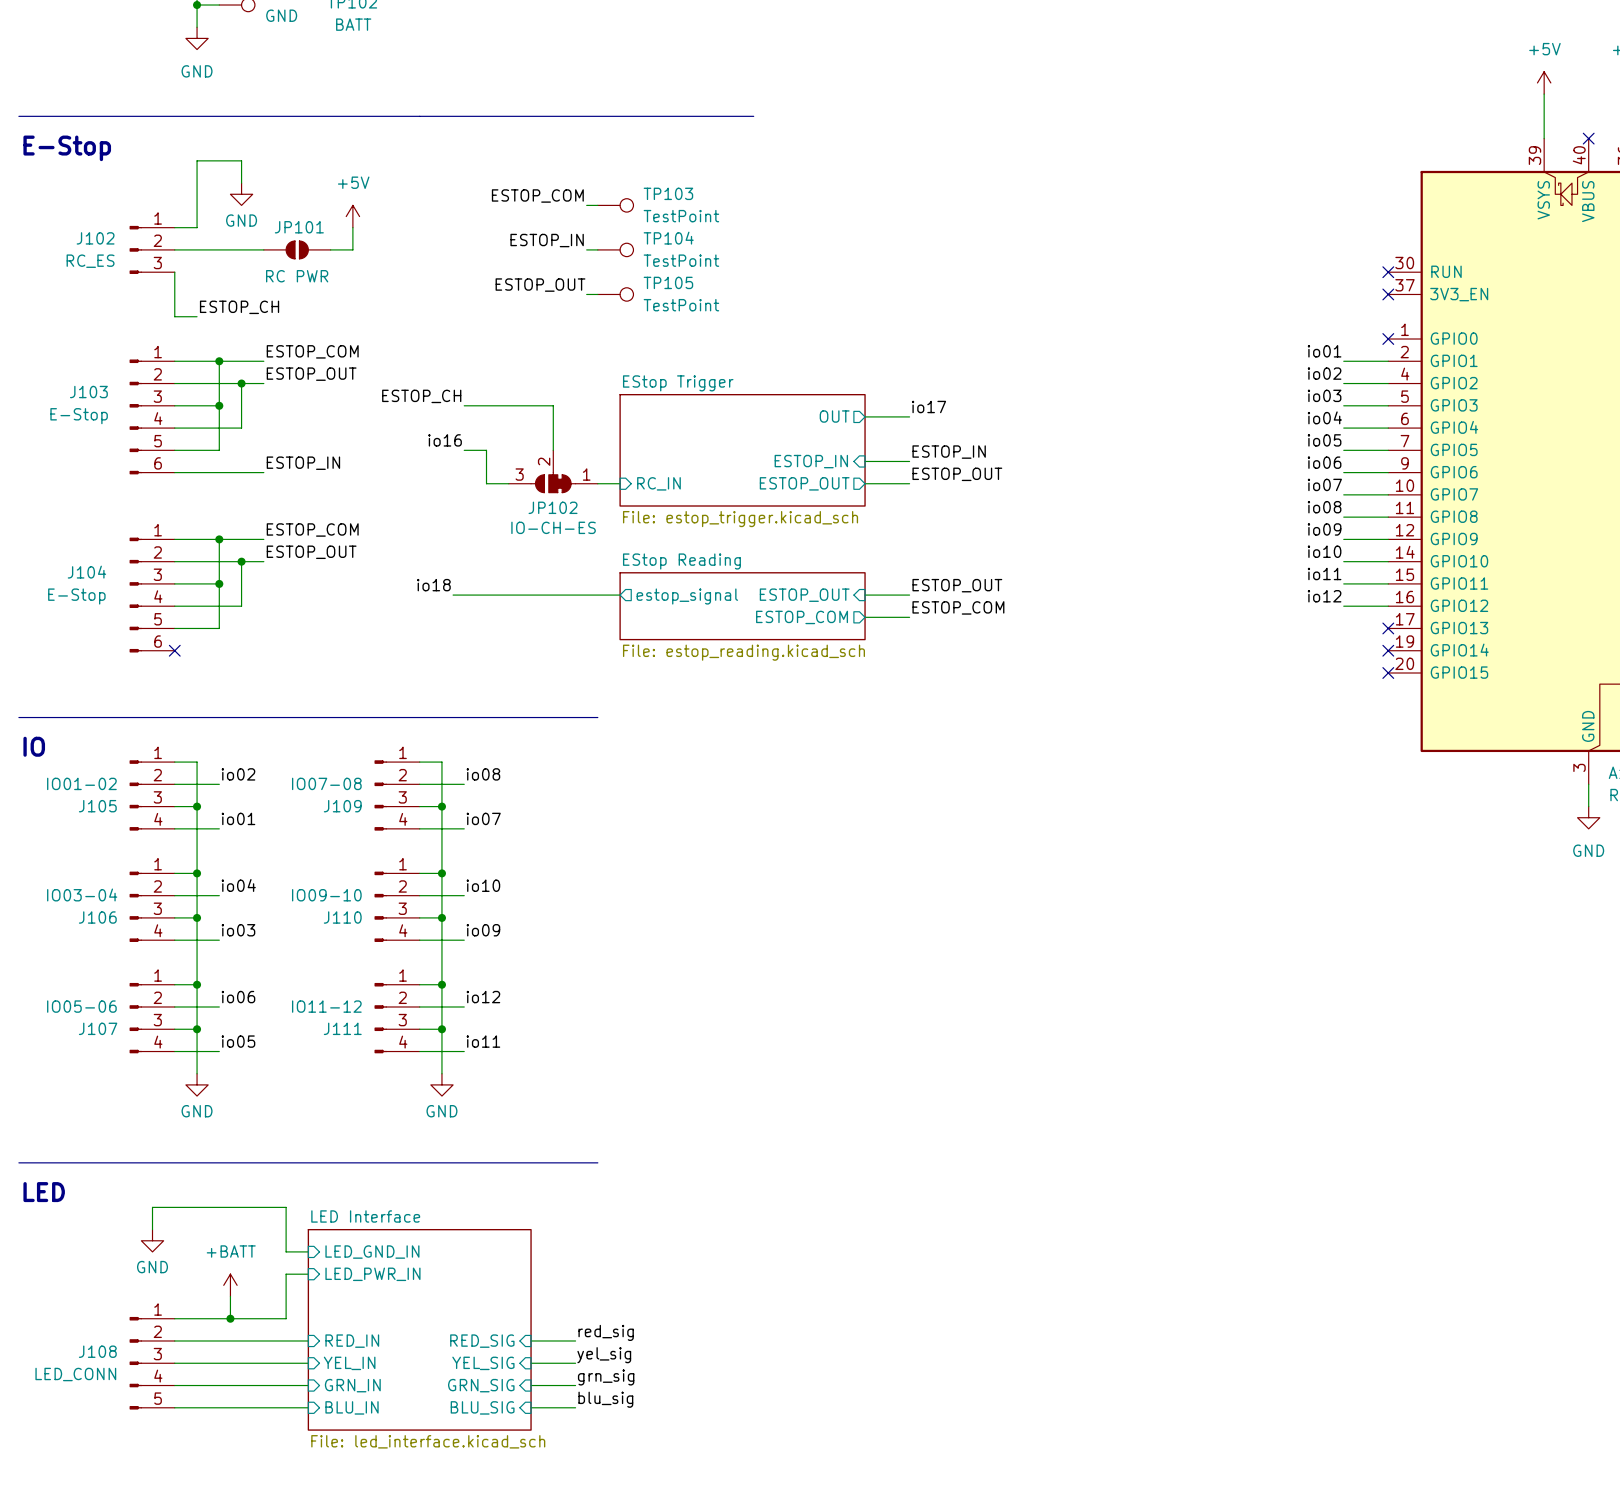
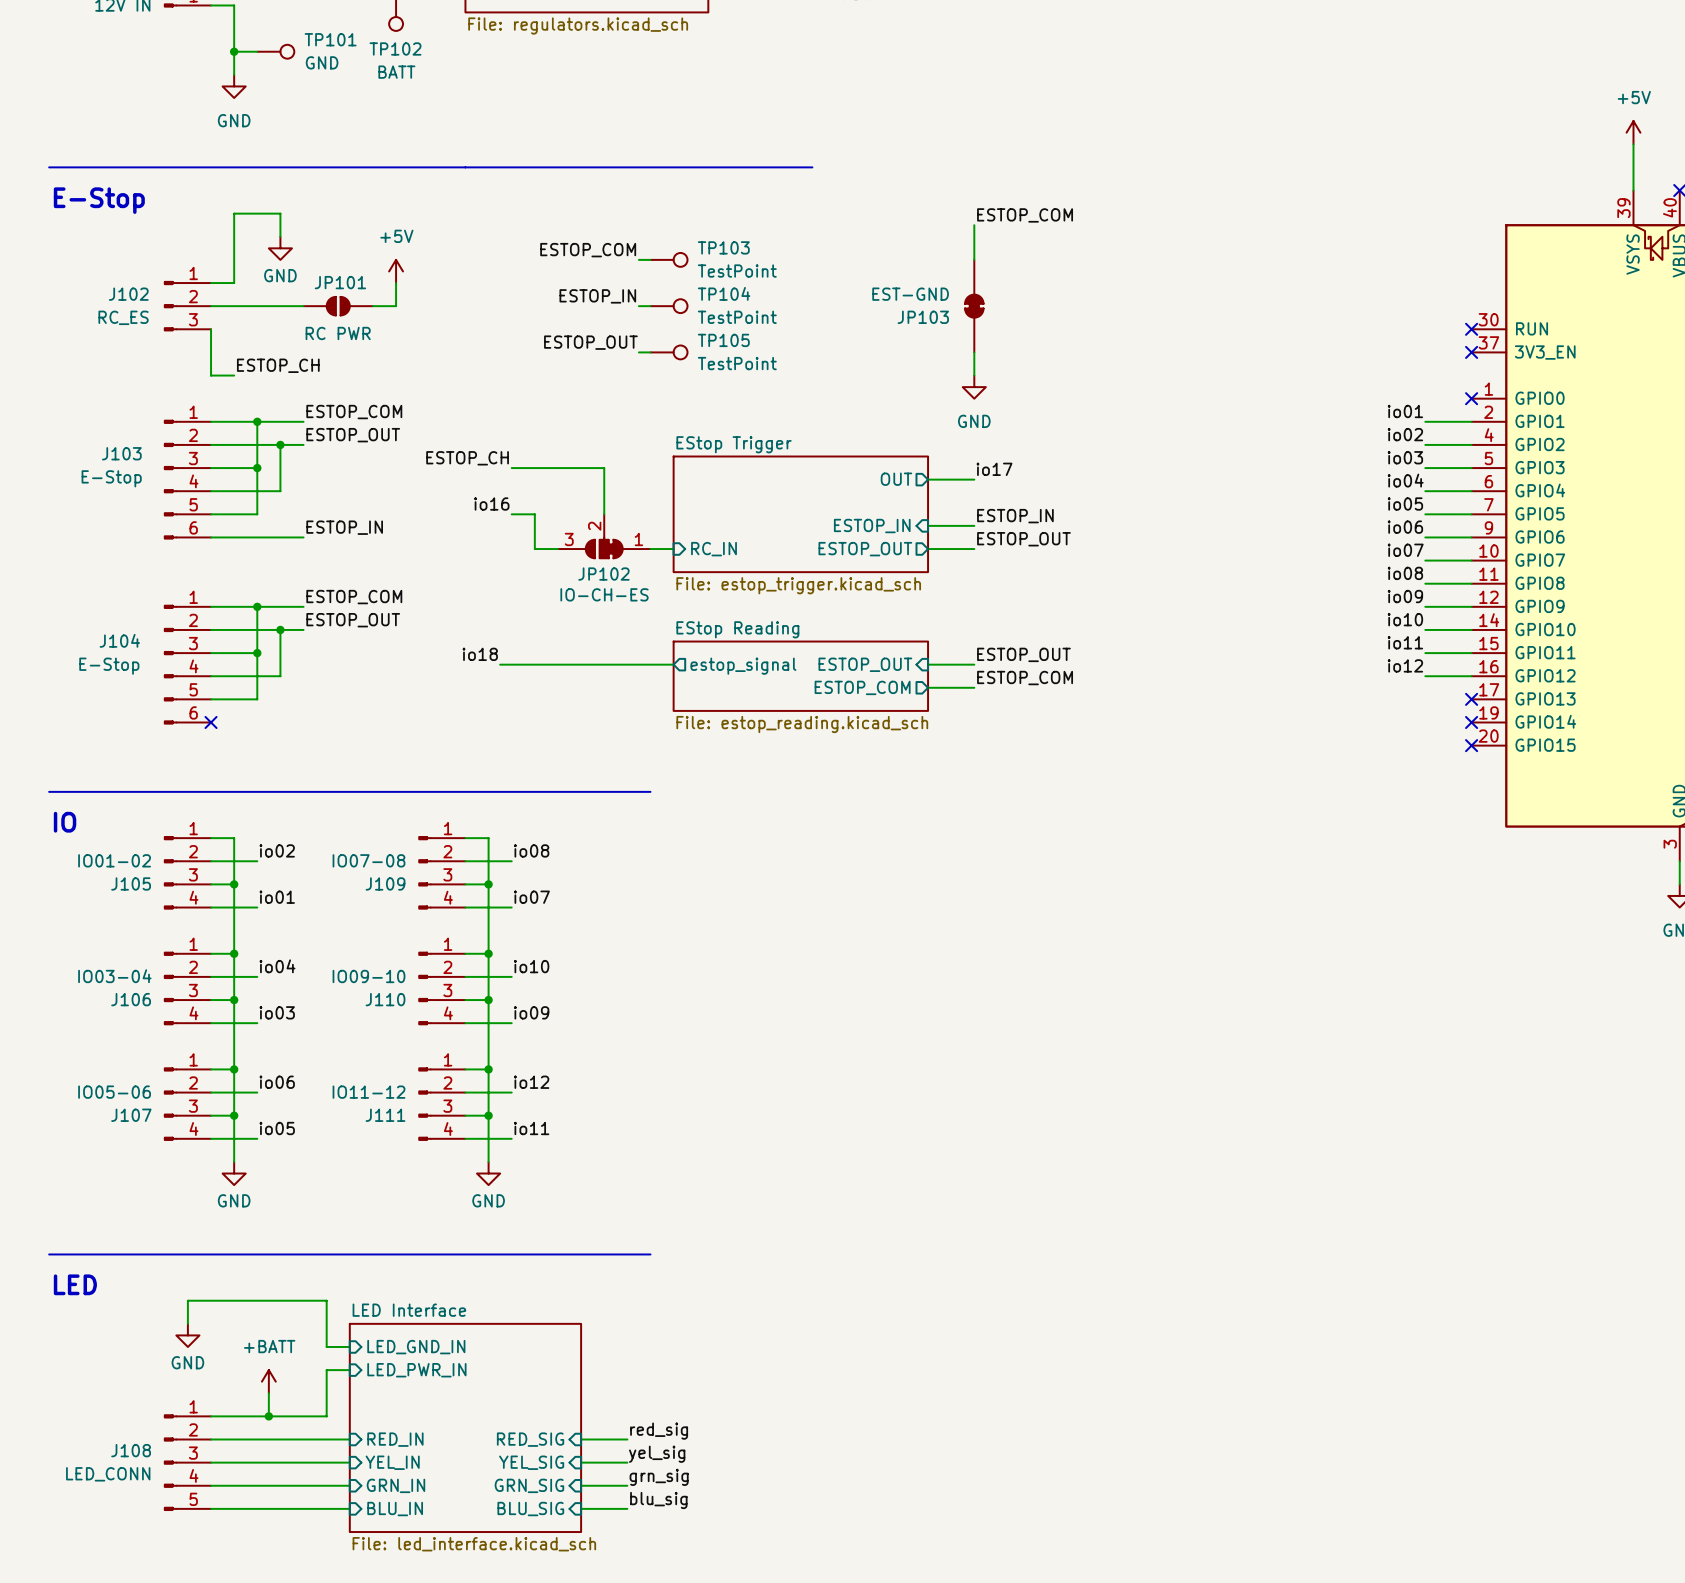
label: none -> ESTOP_COM (1025, 215)
wire: none -> (974, 225) (974, 259)
JP103: none -> EST-GND (974, 306)
wire: none -> (974, 352) (974, 375)
power symbol: none -> GND (974, 387)

